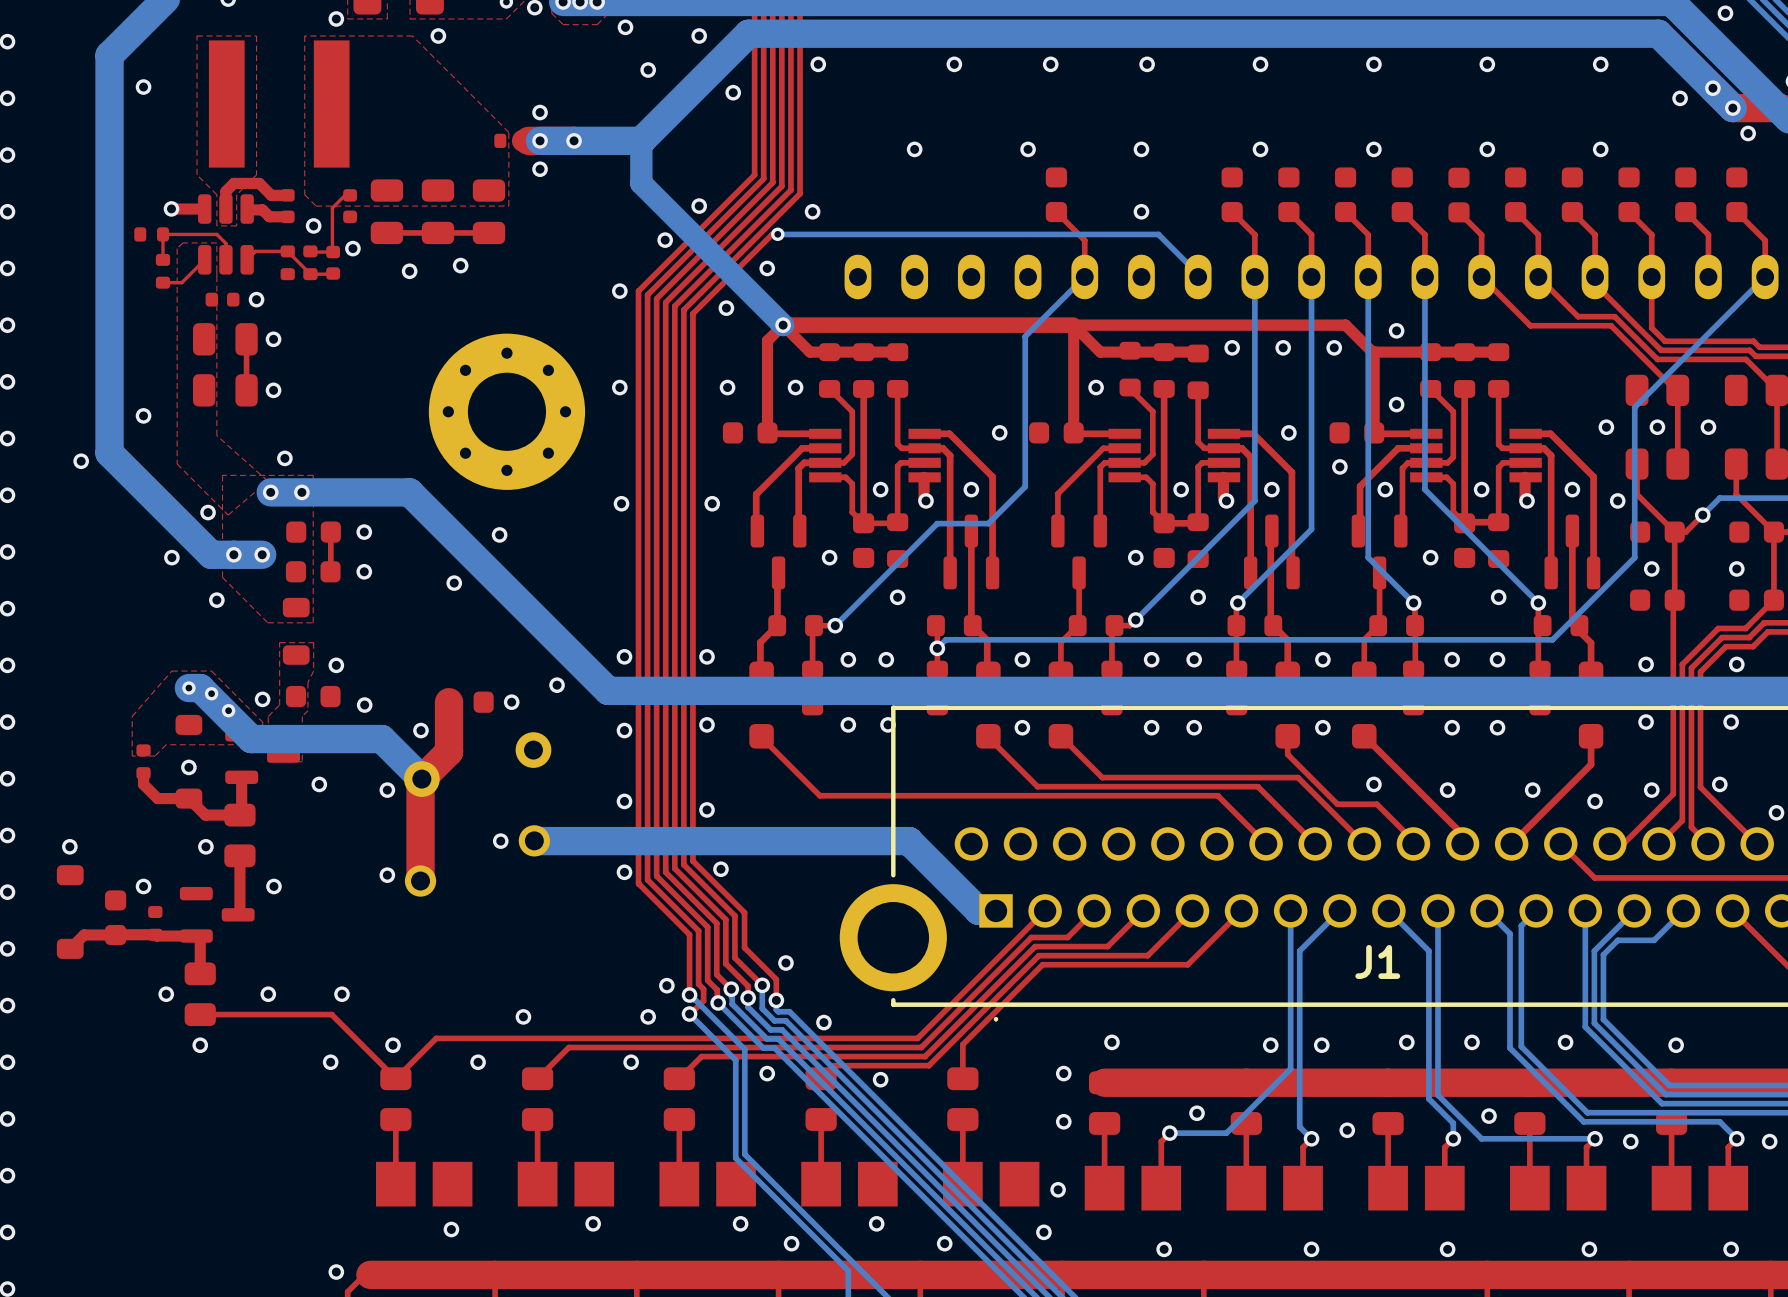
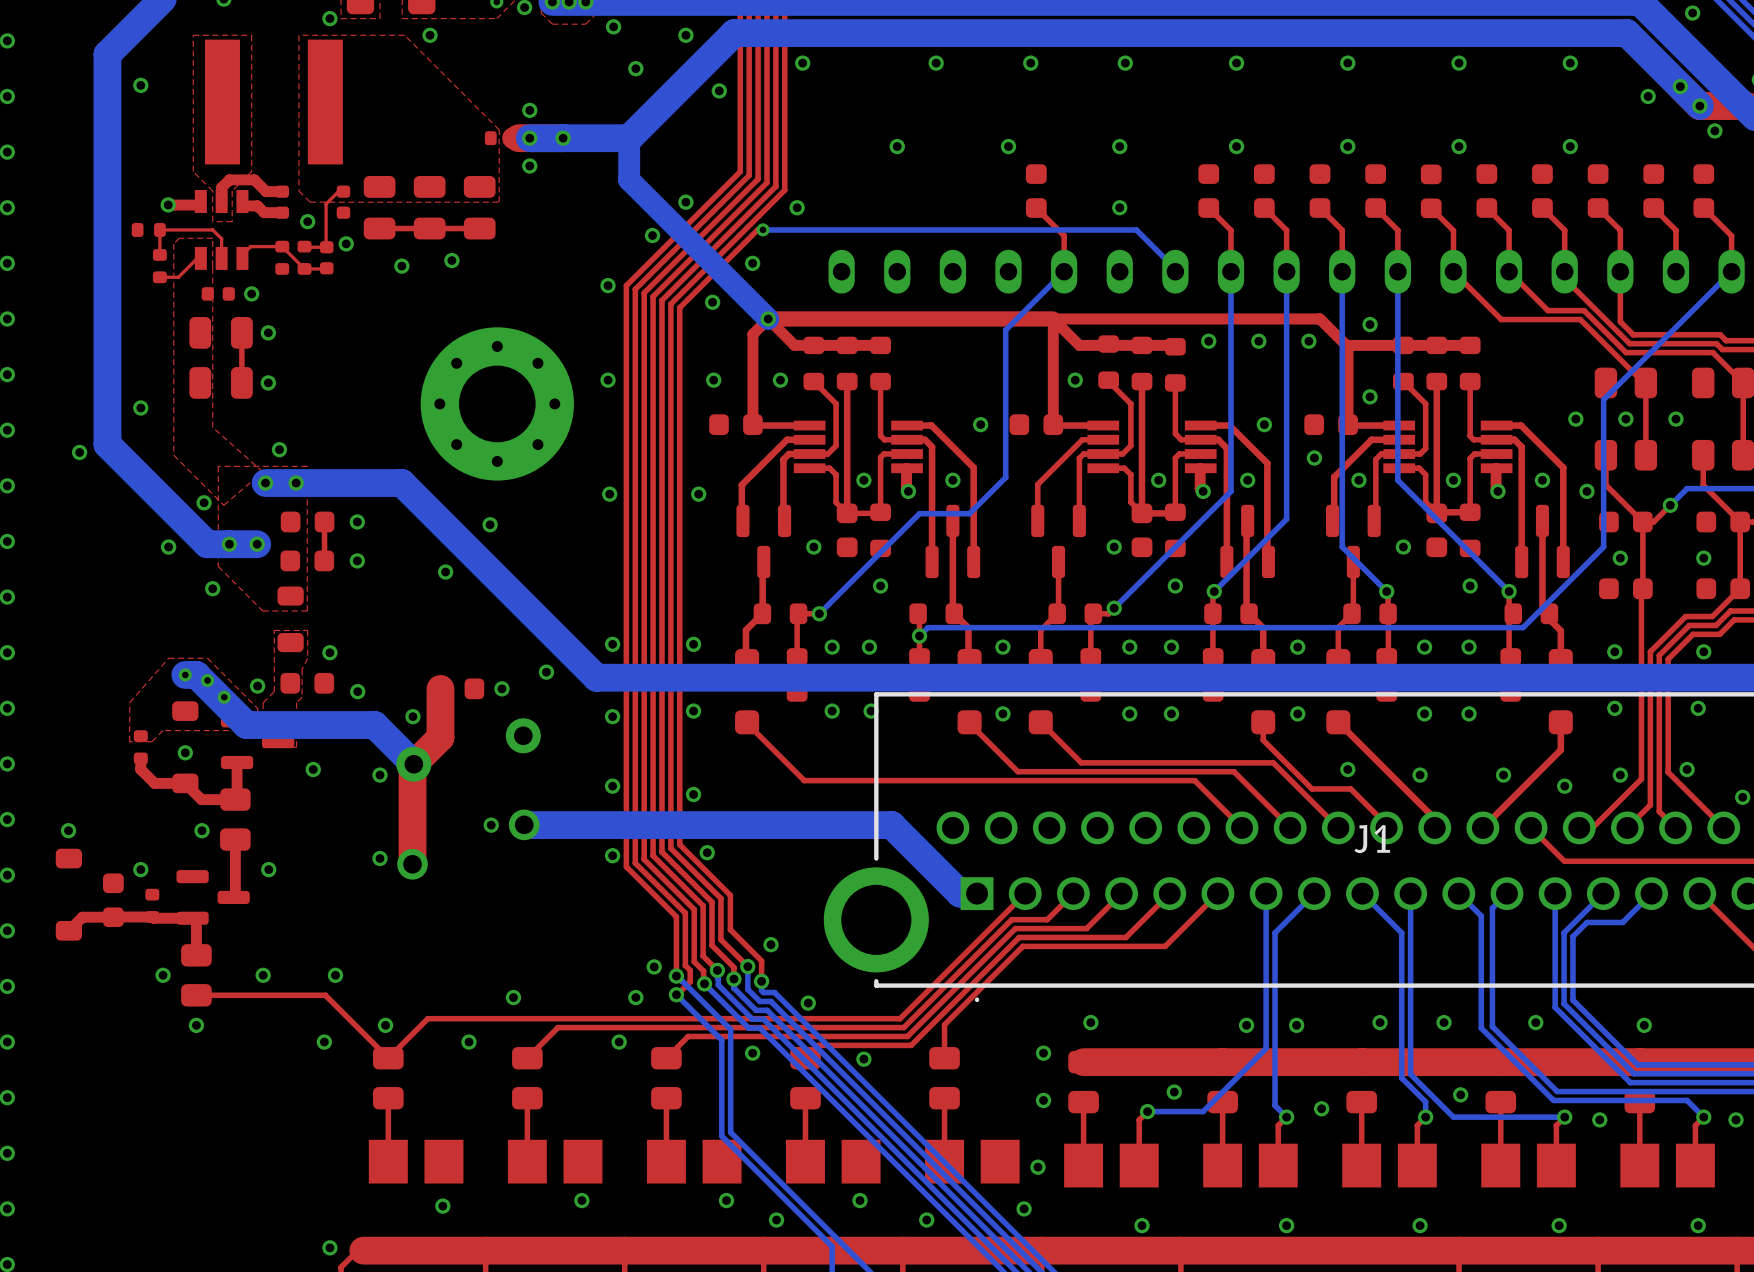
part footprint: [198, 194, 254, 275] -> [194, 190, 249, 270]
J1 name position: J1 (1377, 961) -> J1 (1372, 839)

